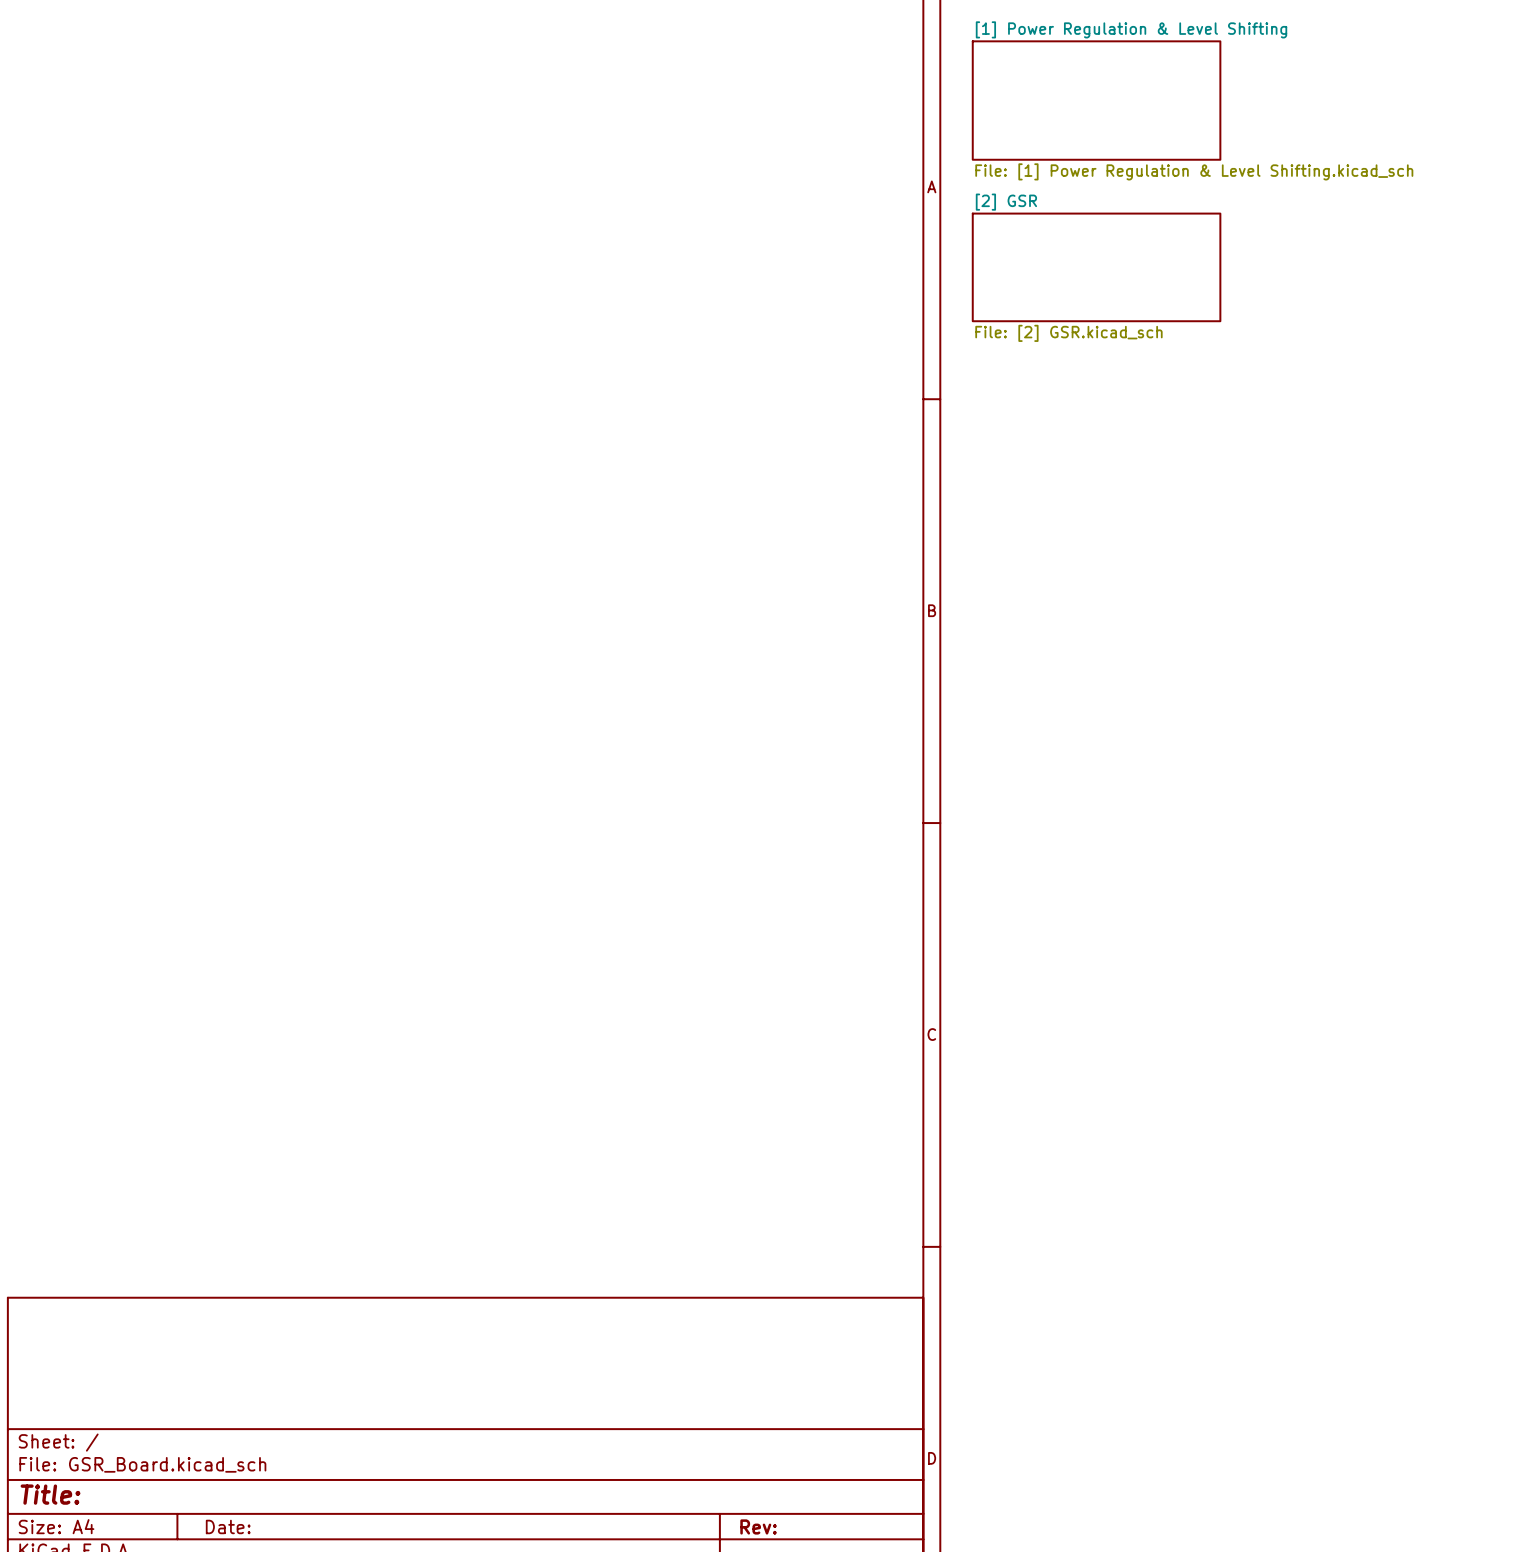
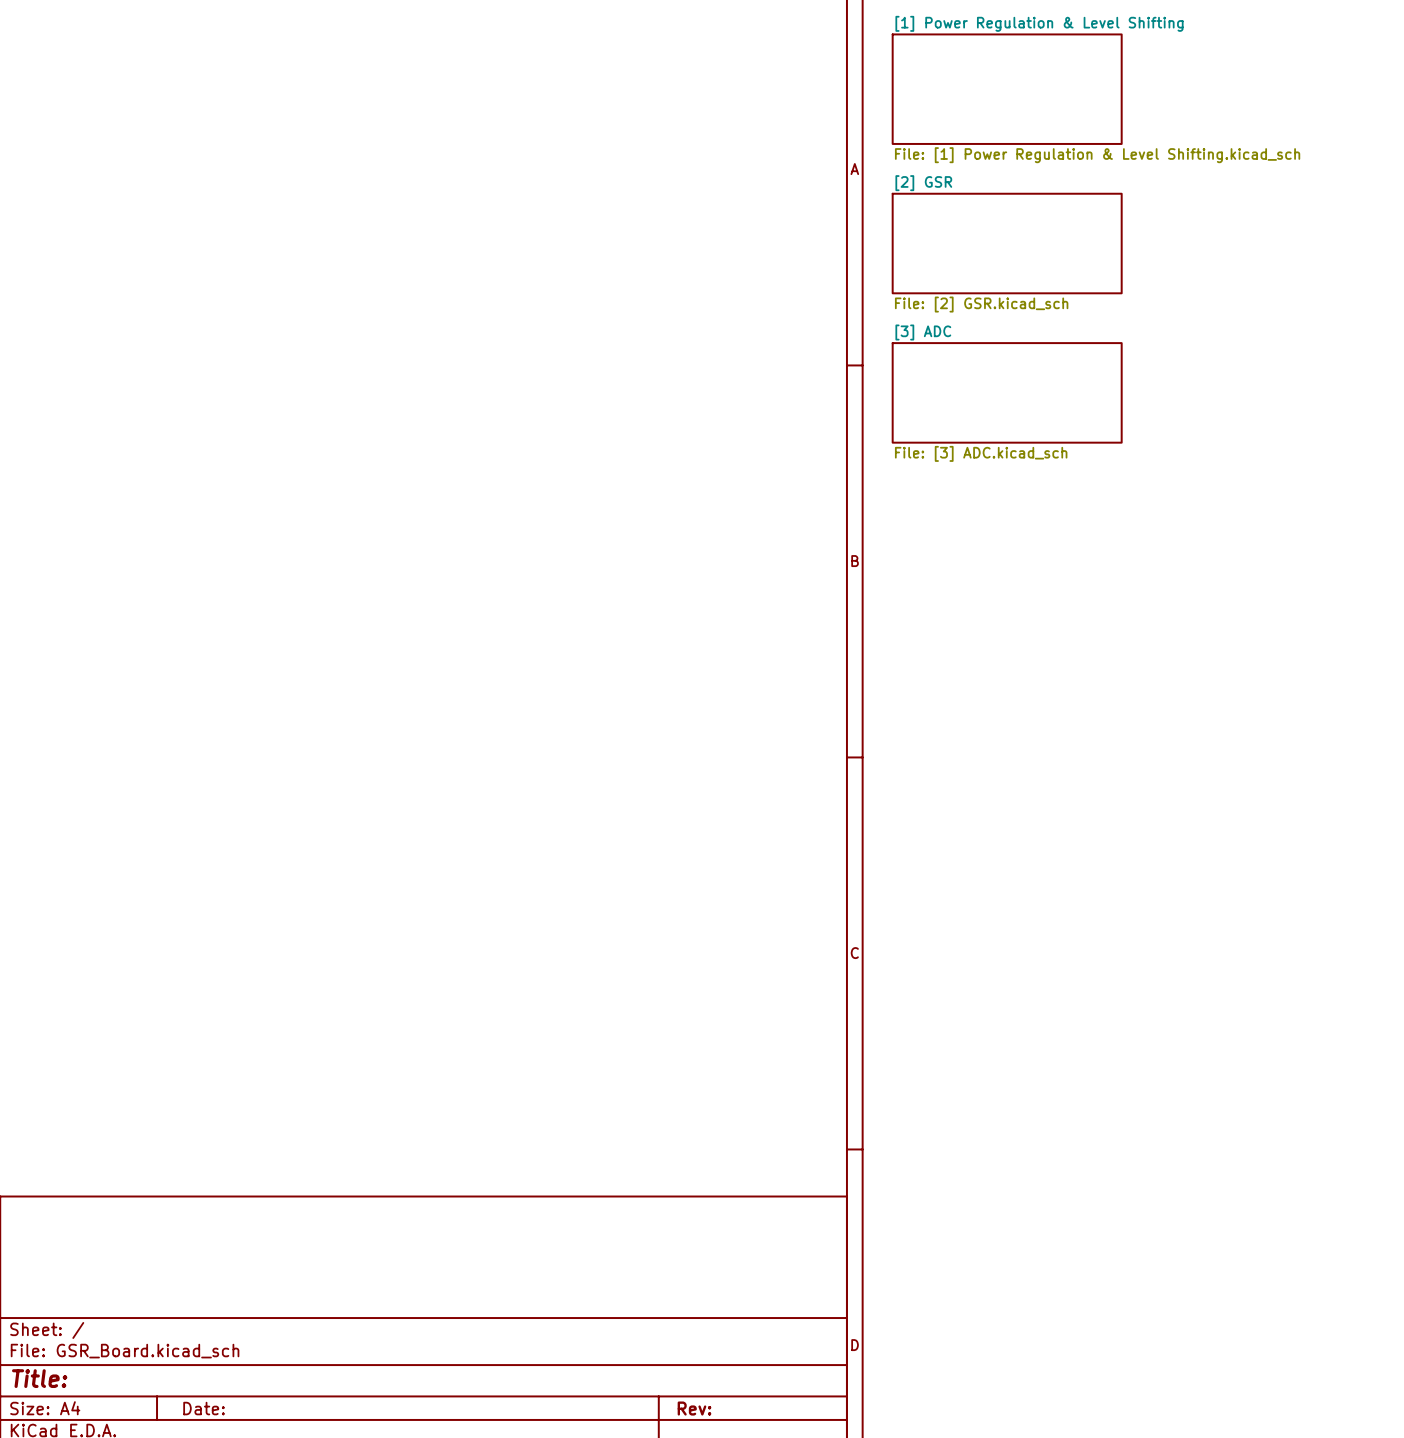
sheet [3] ADC: none -> File: [3] ADC.kicad_sch (1007, 392)

